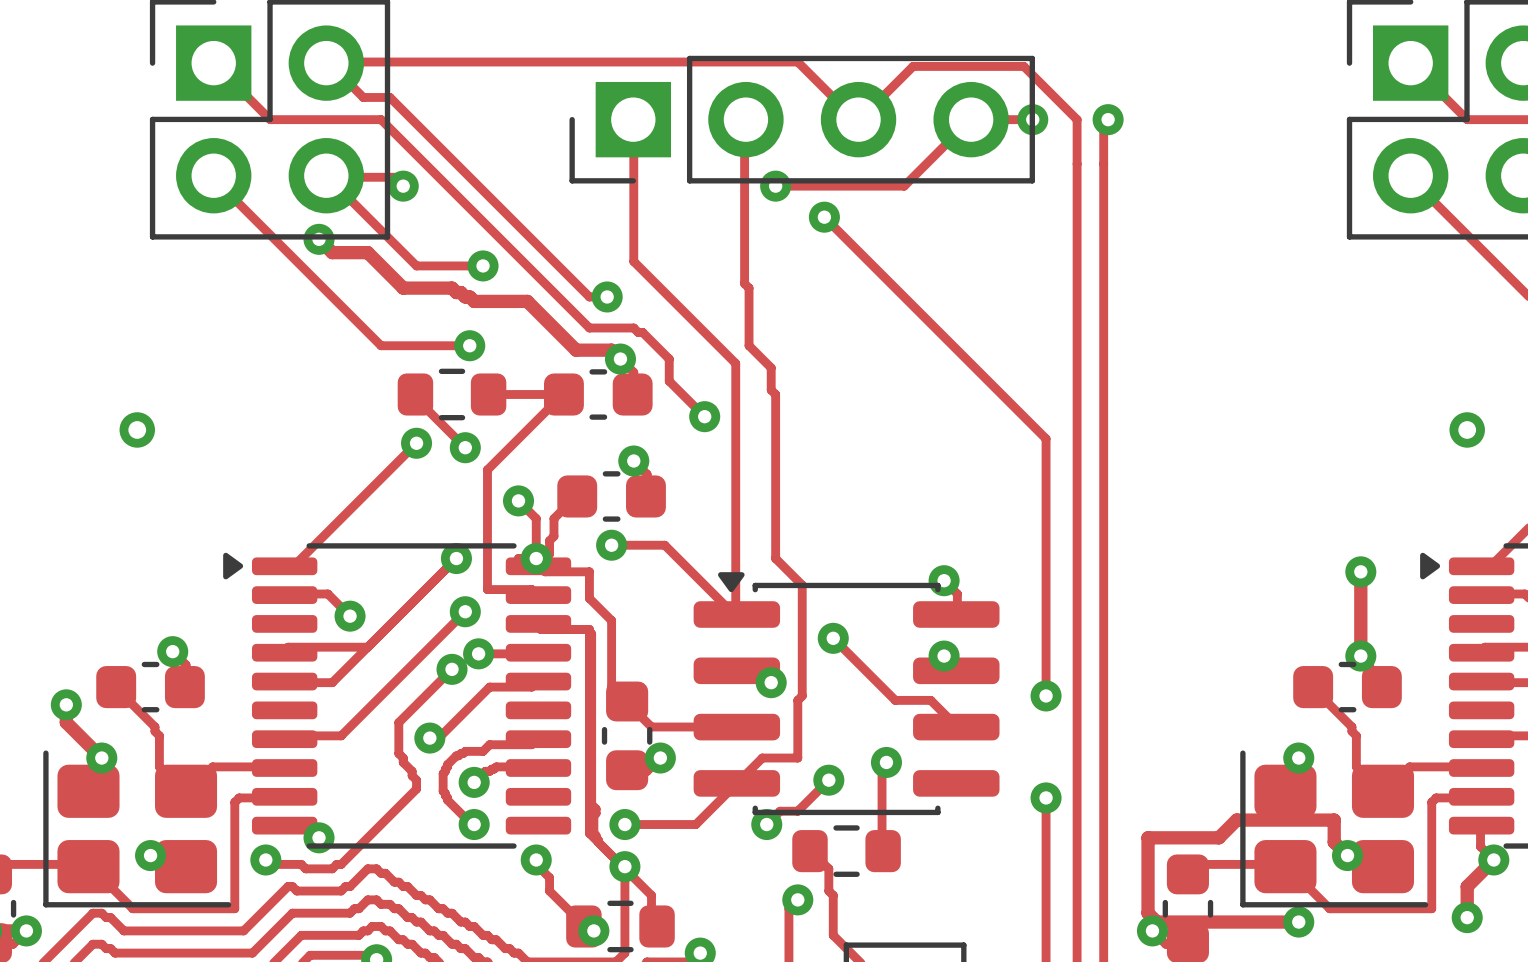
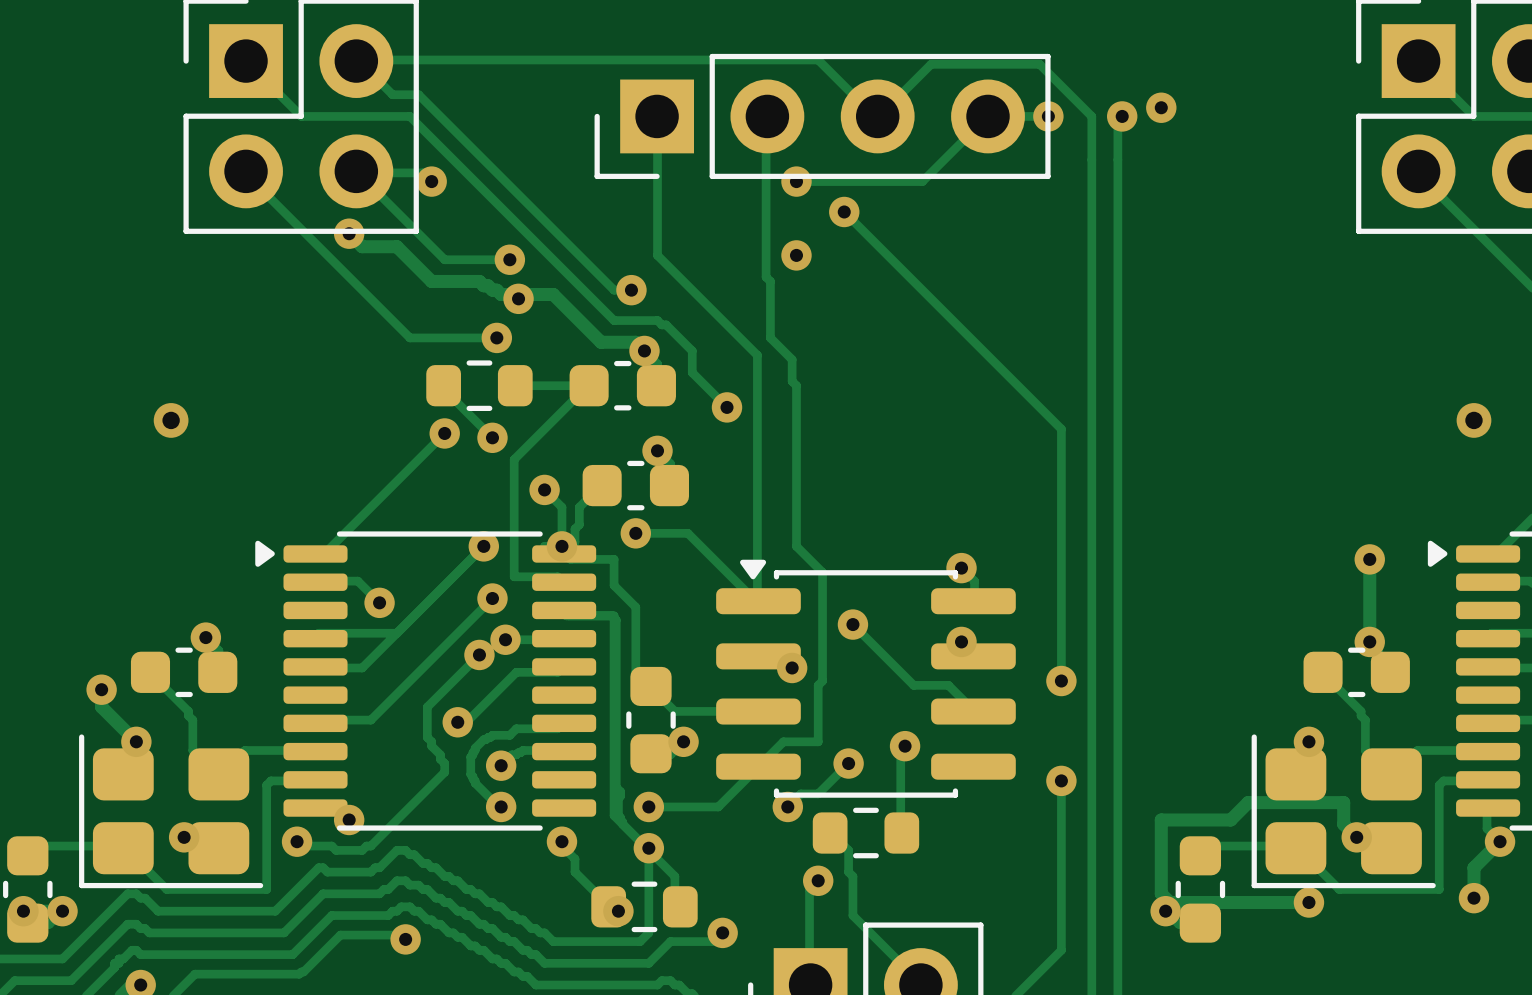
via: none -> (1161, 107)
via: none -> (796, 255)
via: none -> (518, 298)

